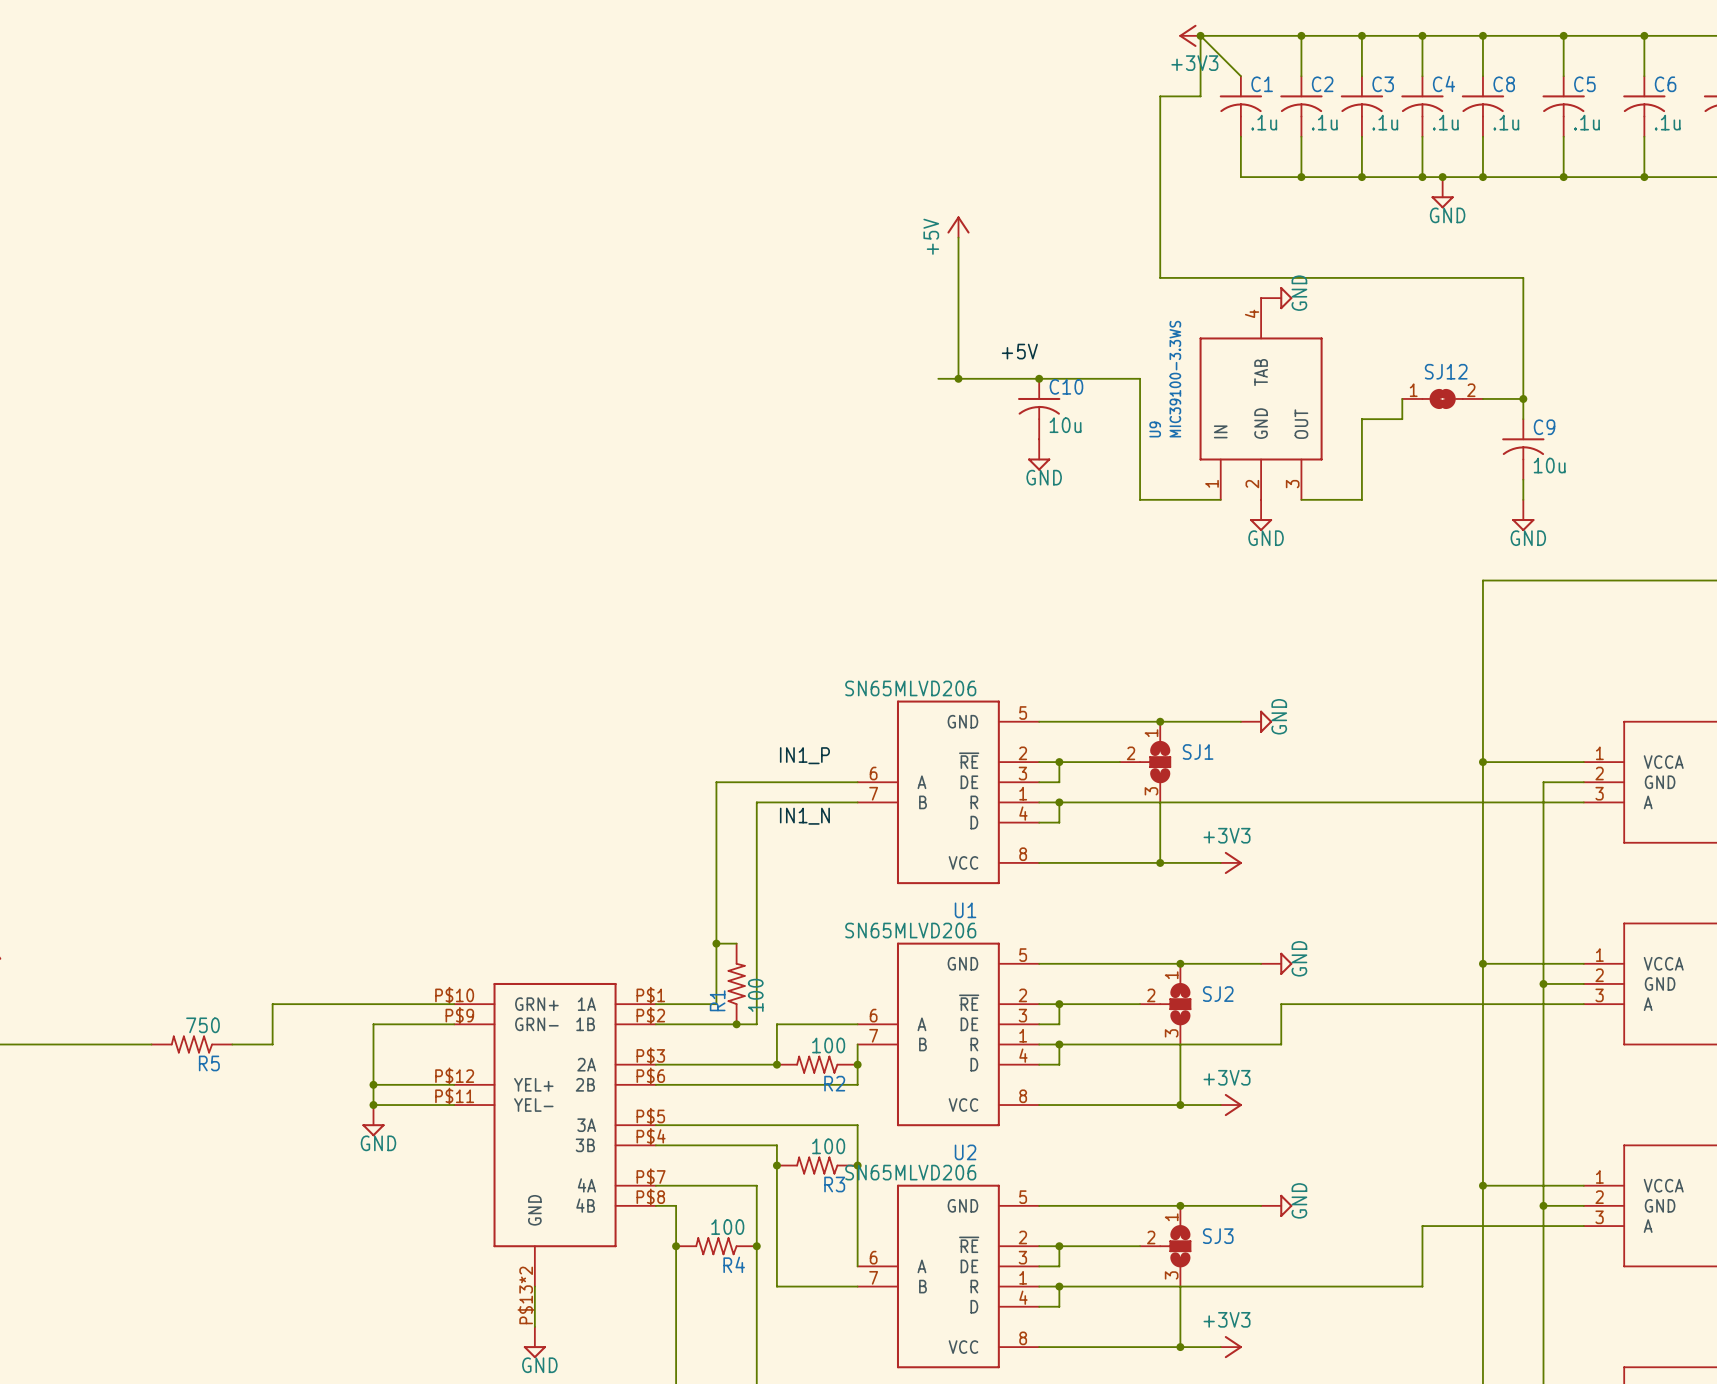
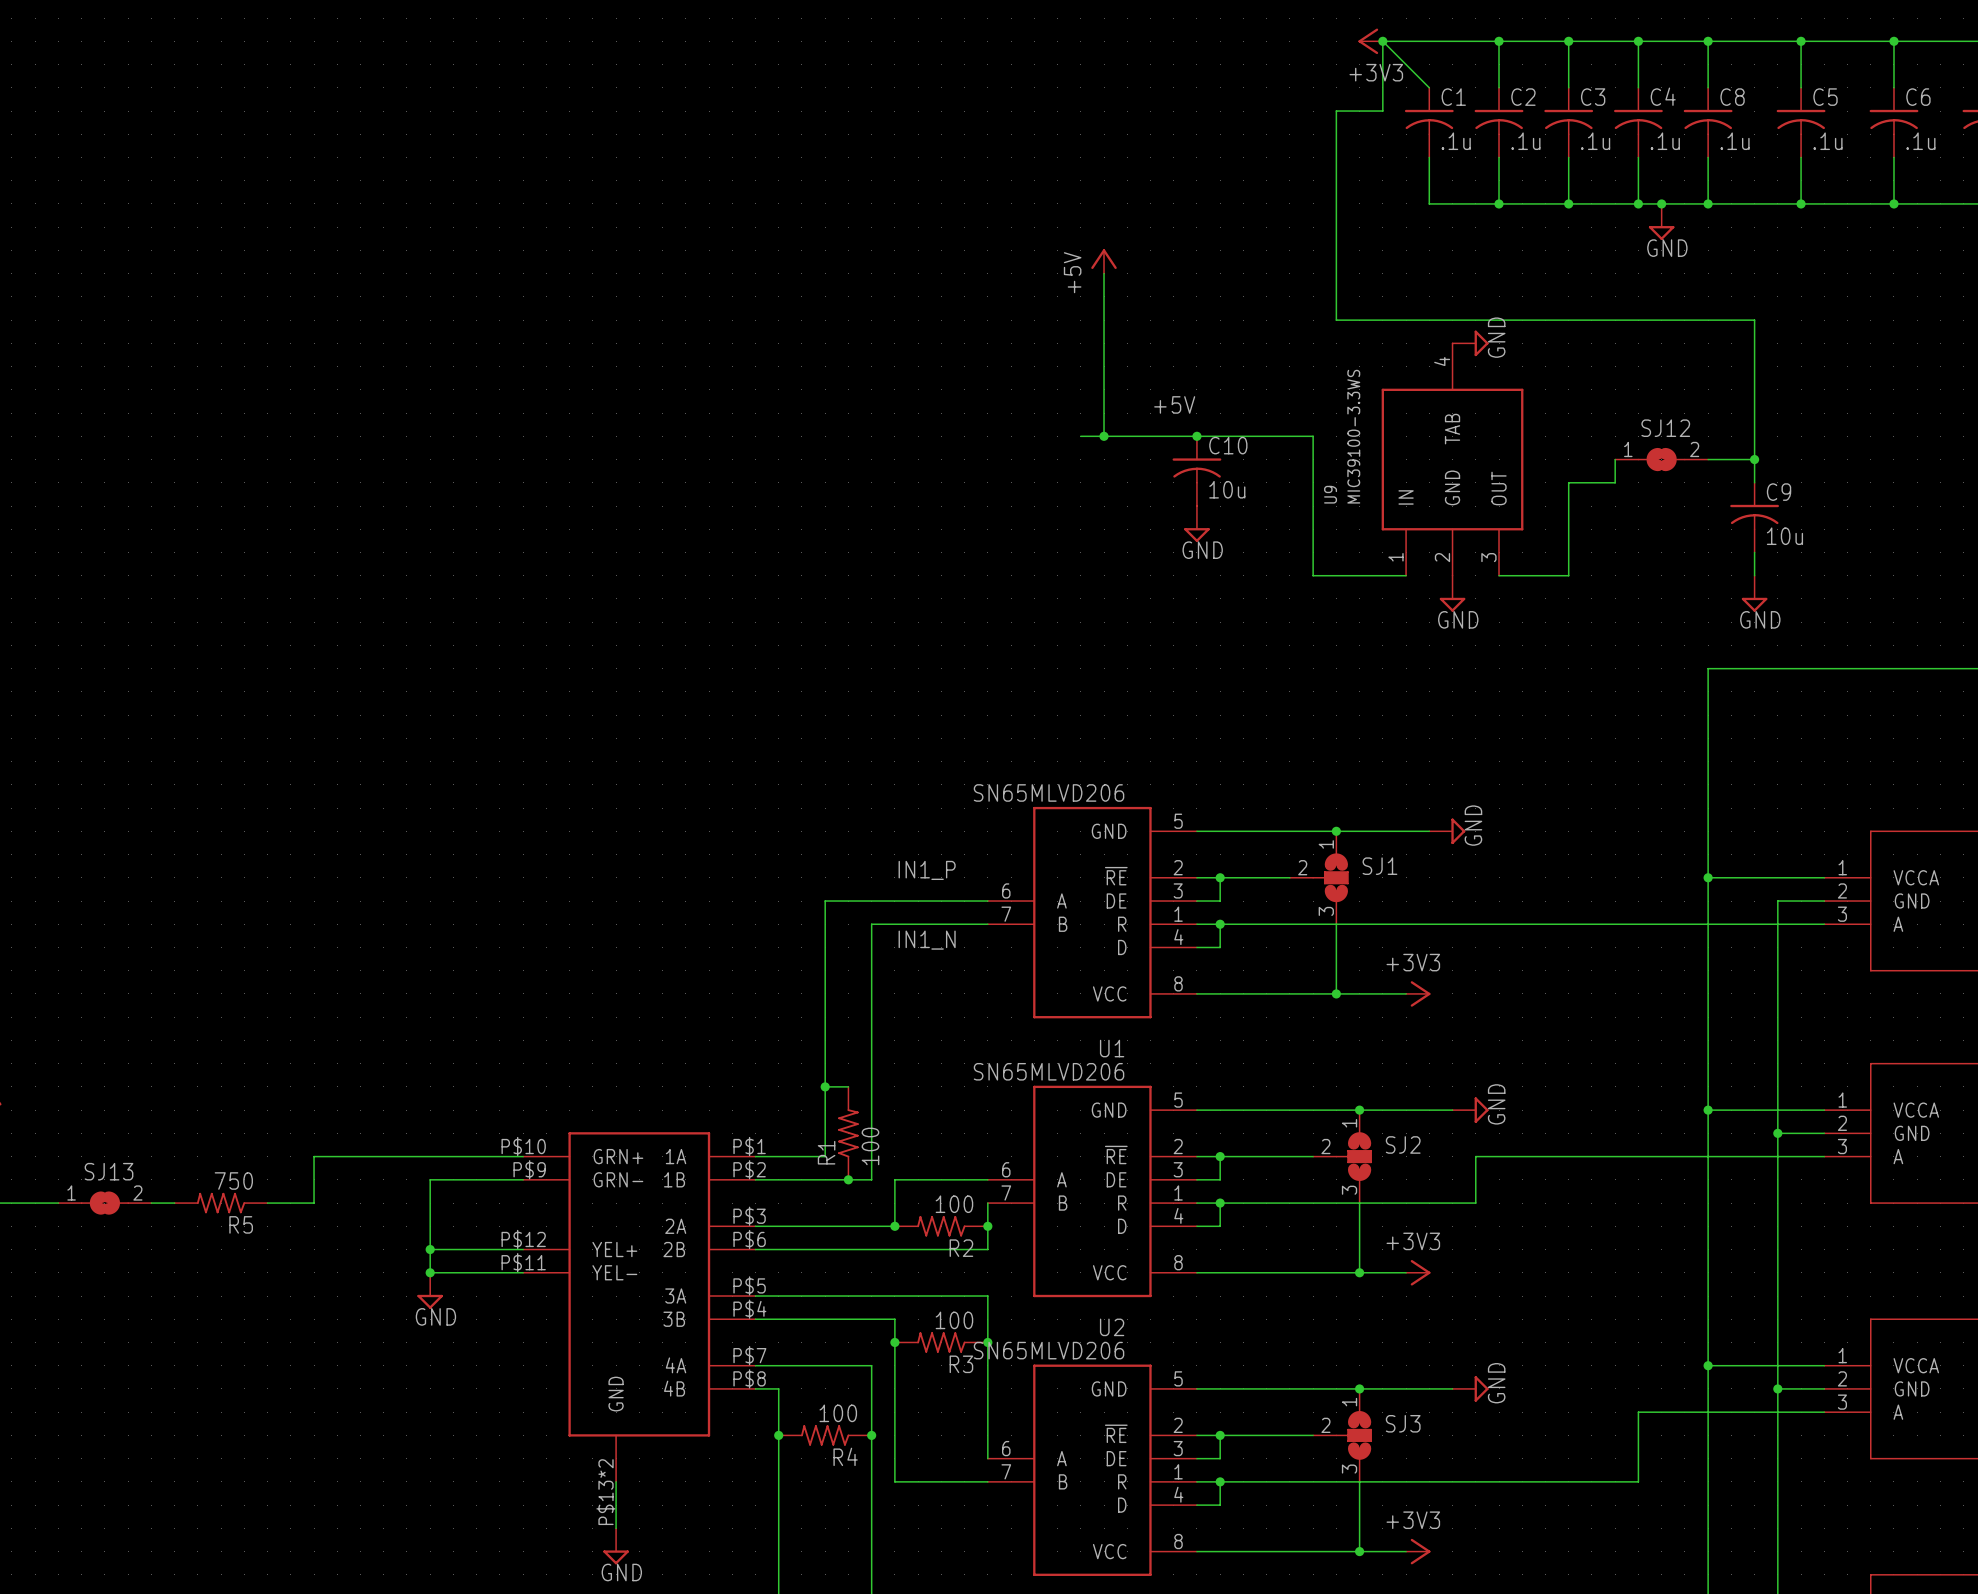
SJ13: none -> (104, 1203)

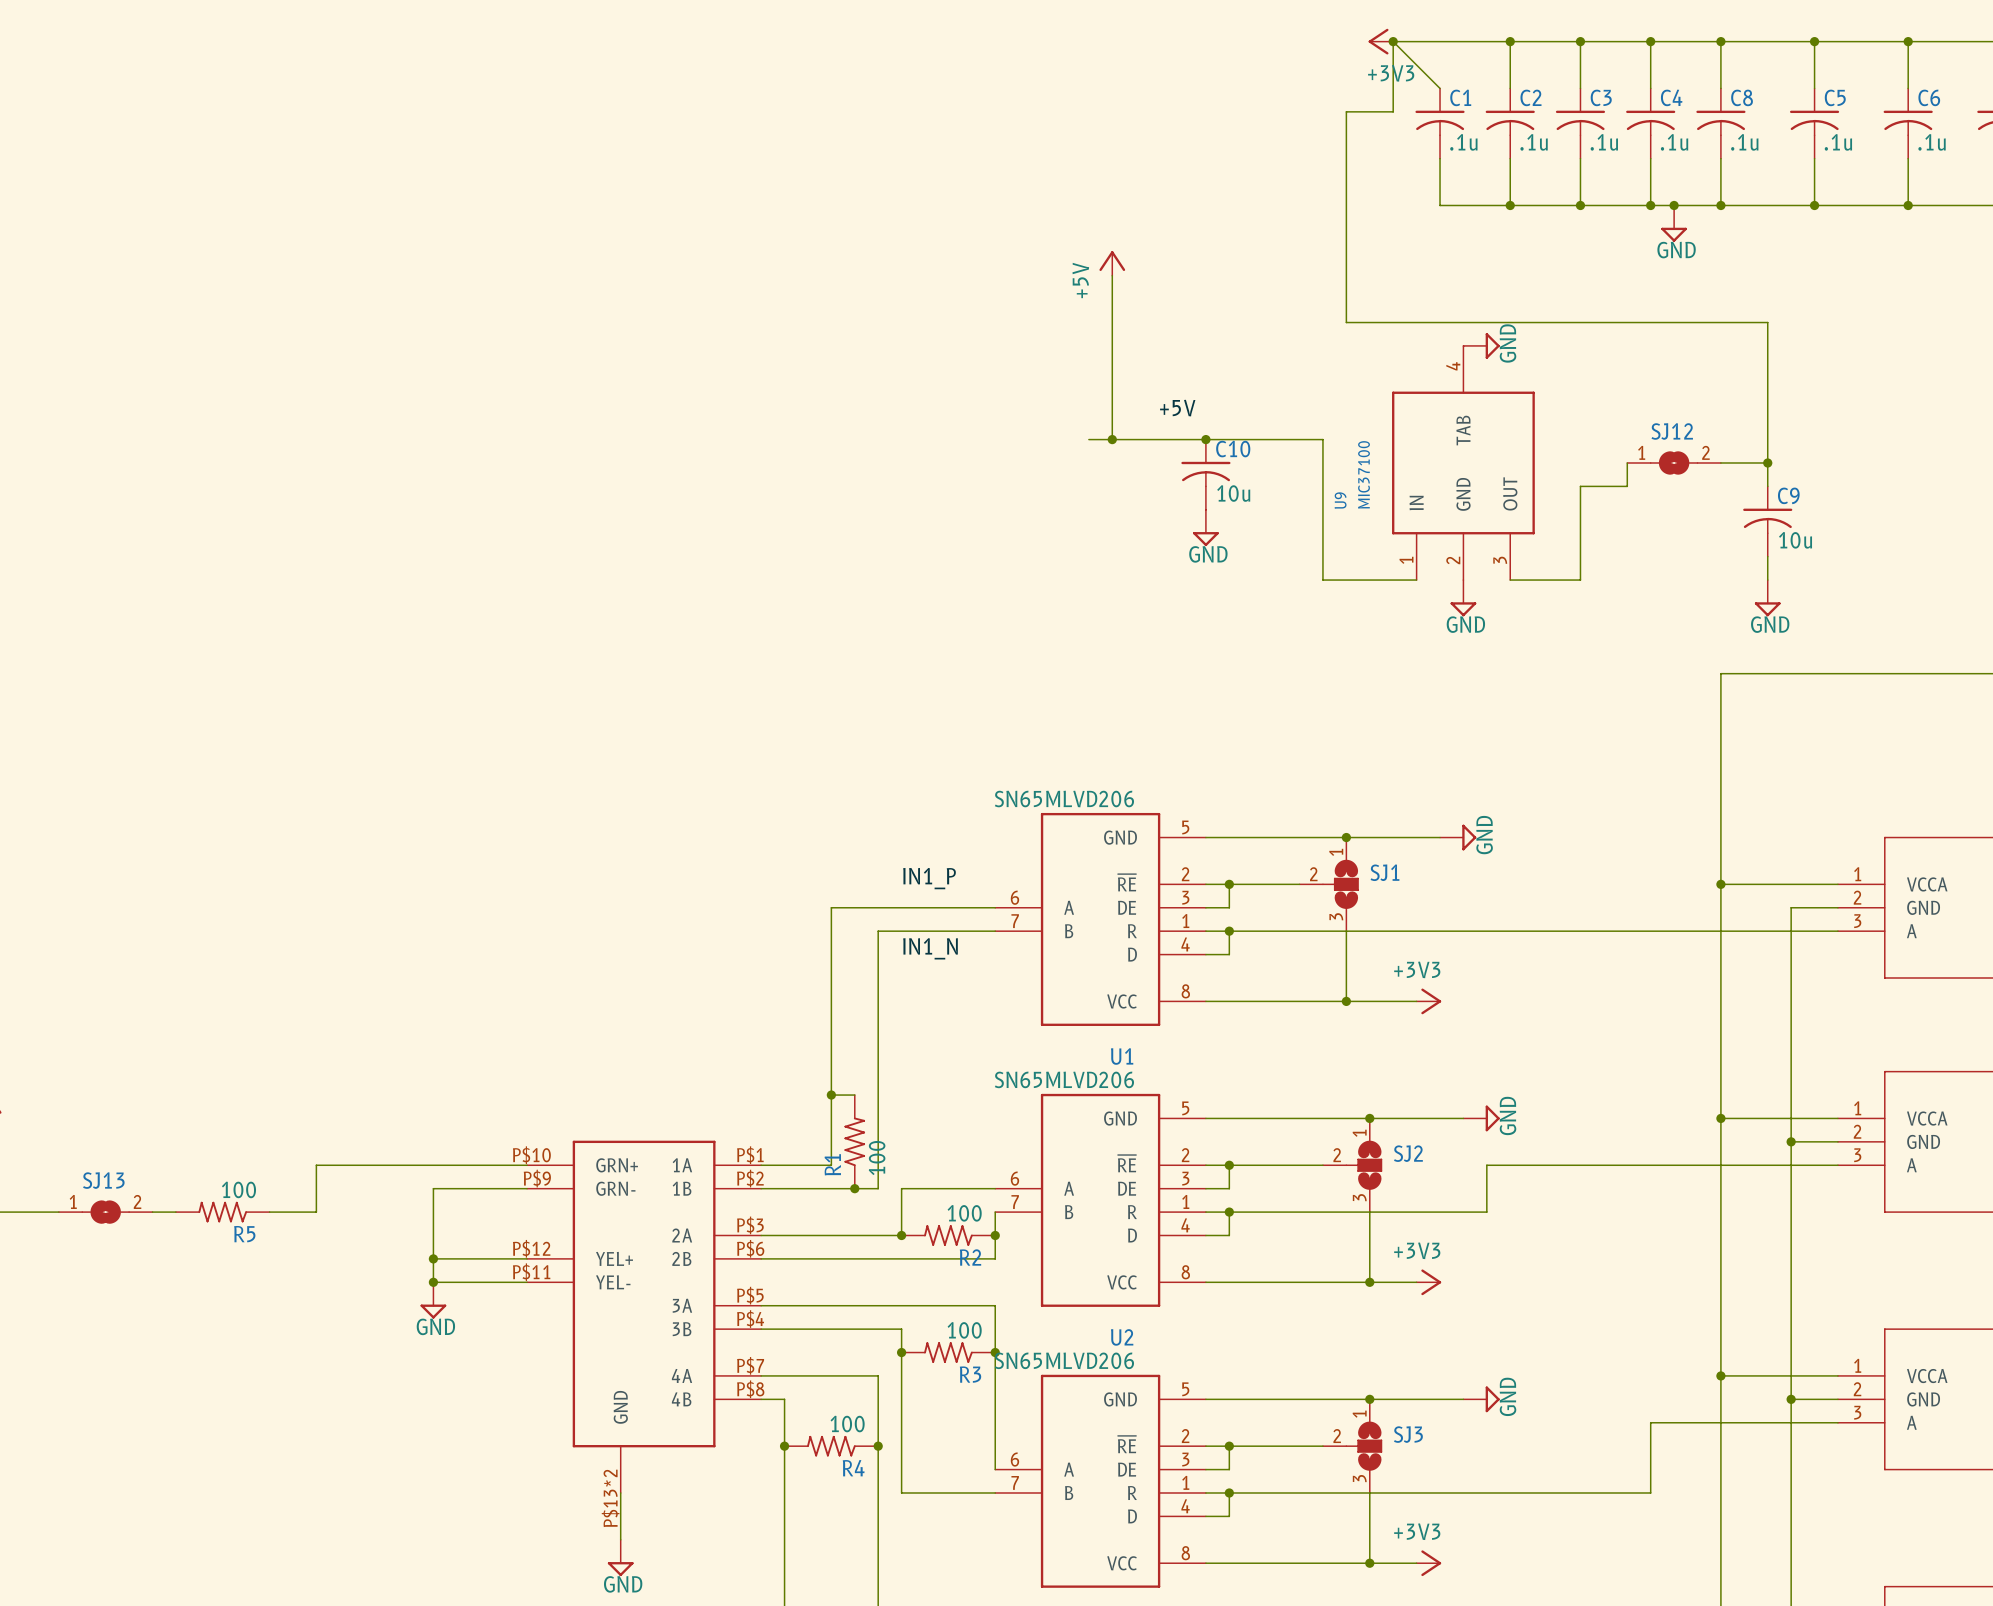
U9 value: MIC39100-3.3WS (1353, 436) -> MIC37100 (1364, 474)
R5 value: 750 (233, 1180) -> 100 (238, 1189)

